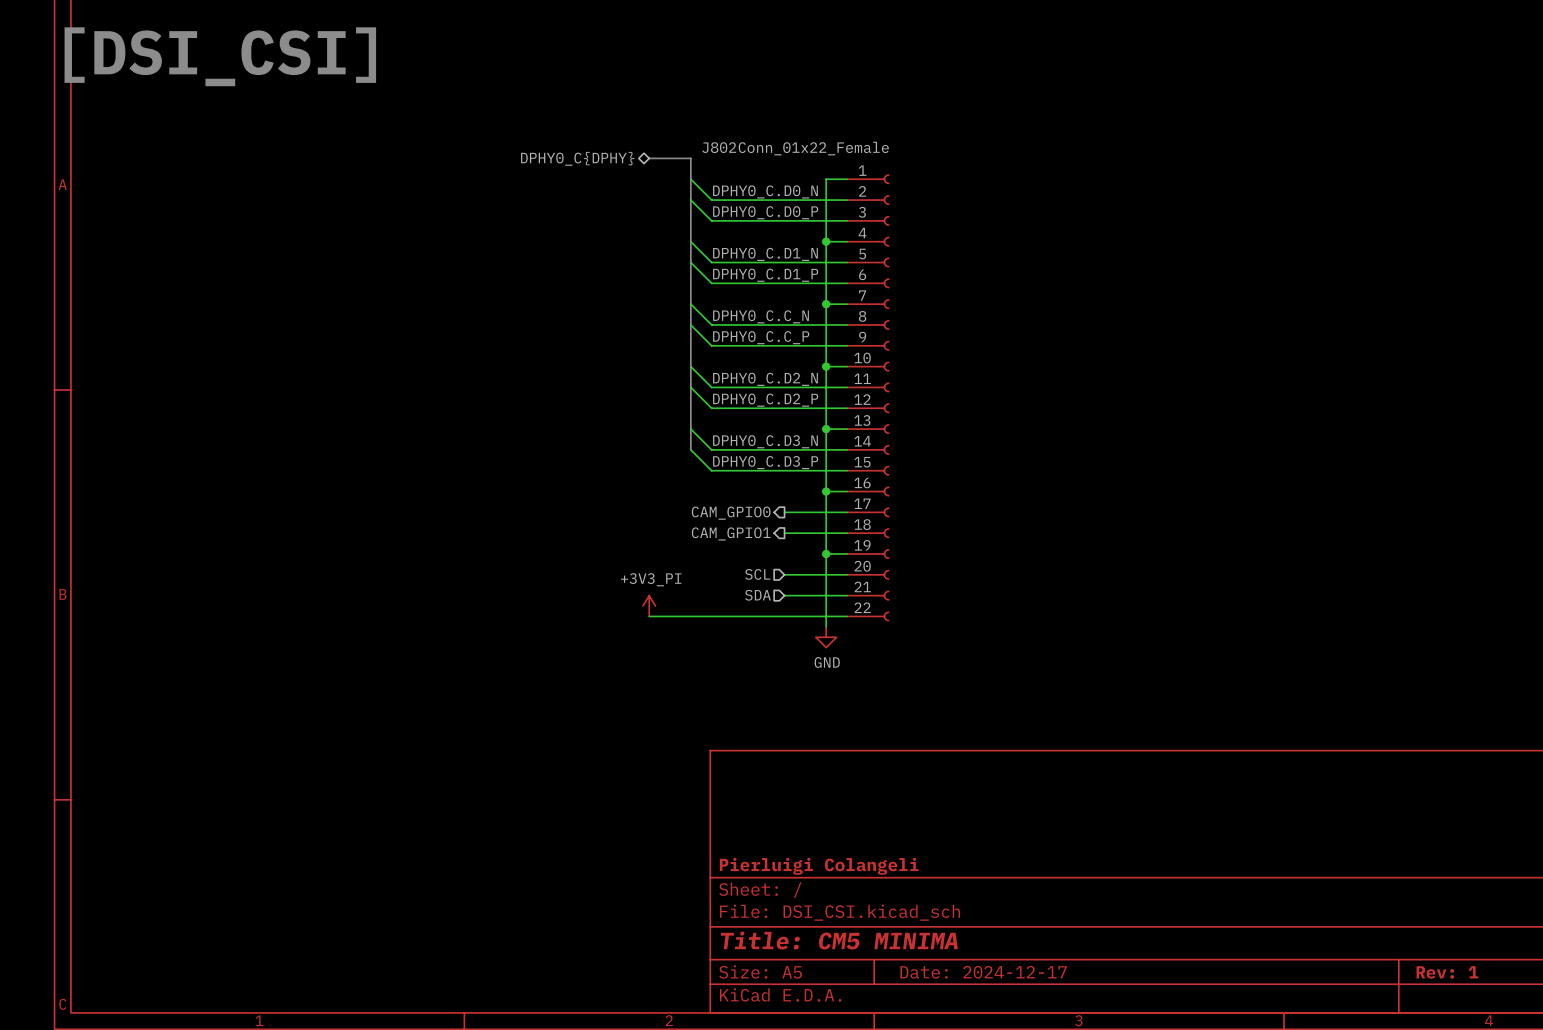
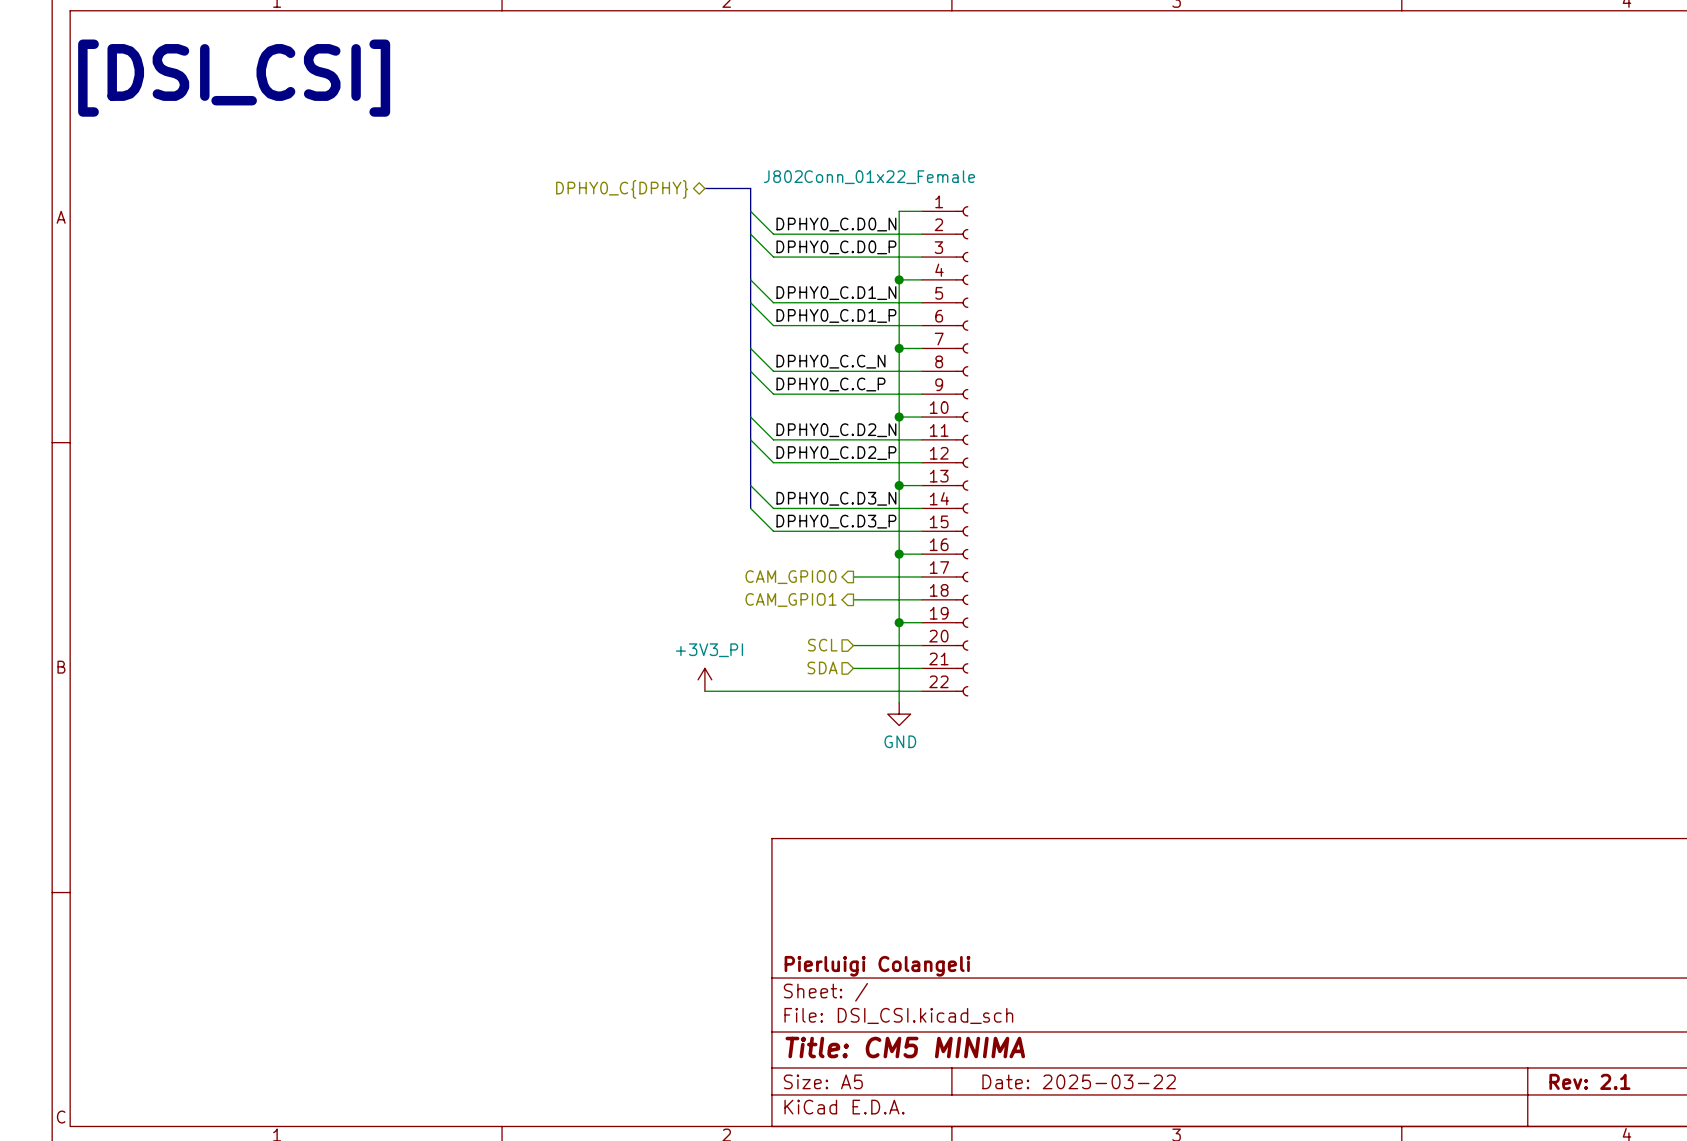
title block: Date: 2024-12-17 (983, 972) -> Date: 2025-03-22 (1079, 1081)
title block: Rev: 1 (1447, 972) -> Rev: 2.1 (1589, 1081)

